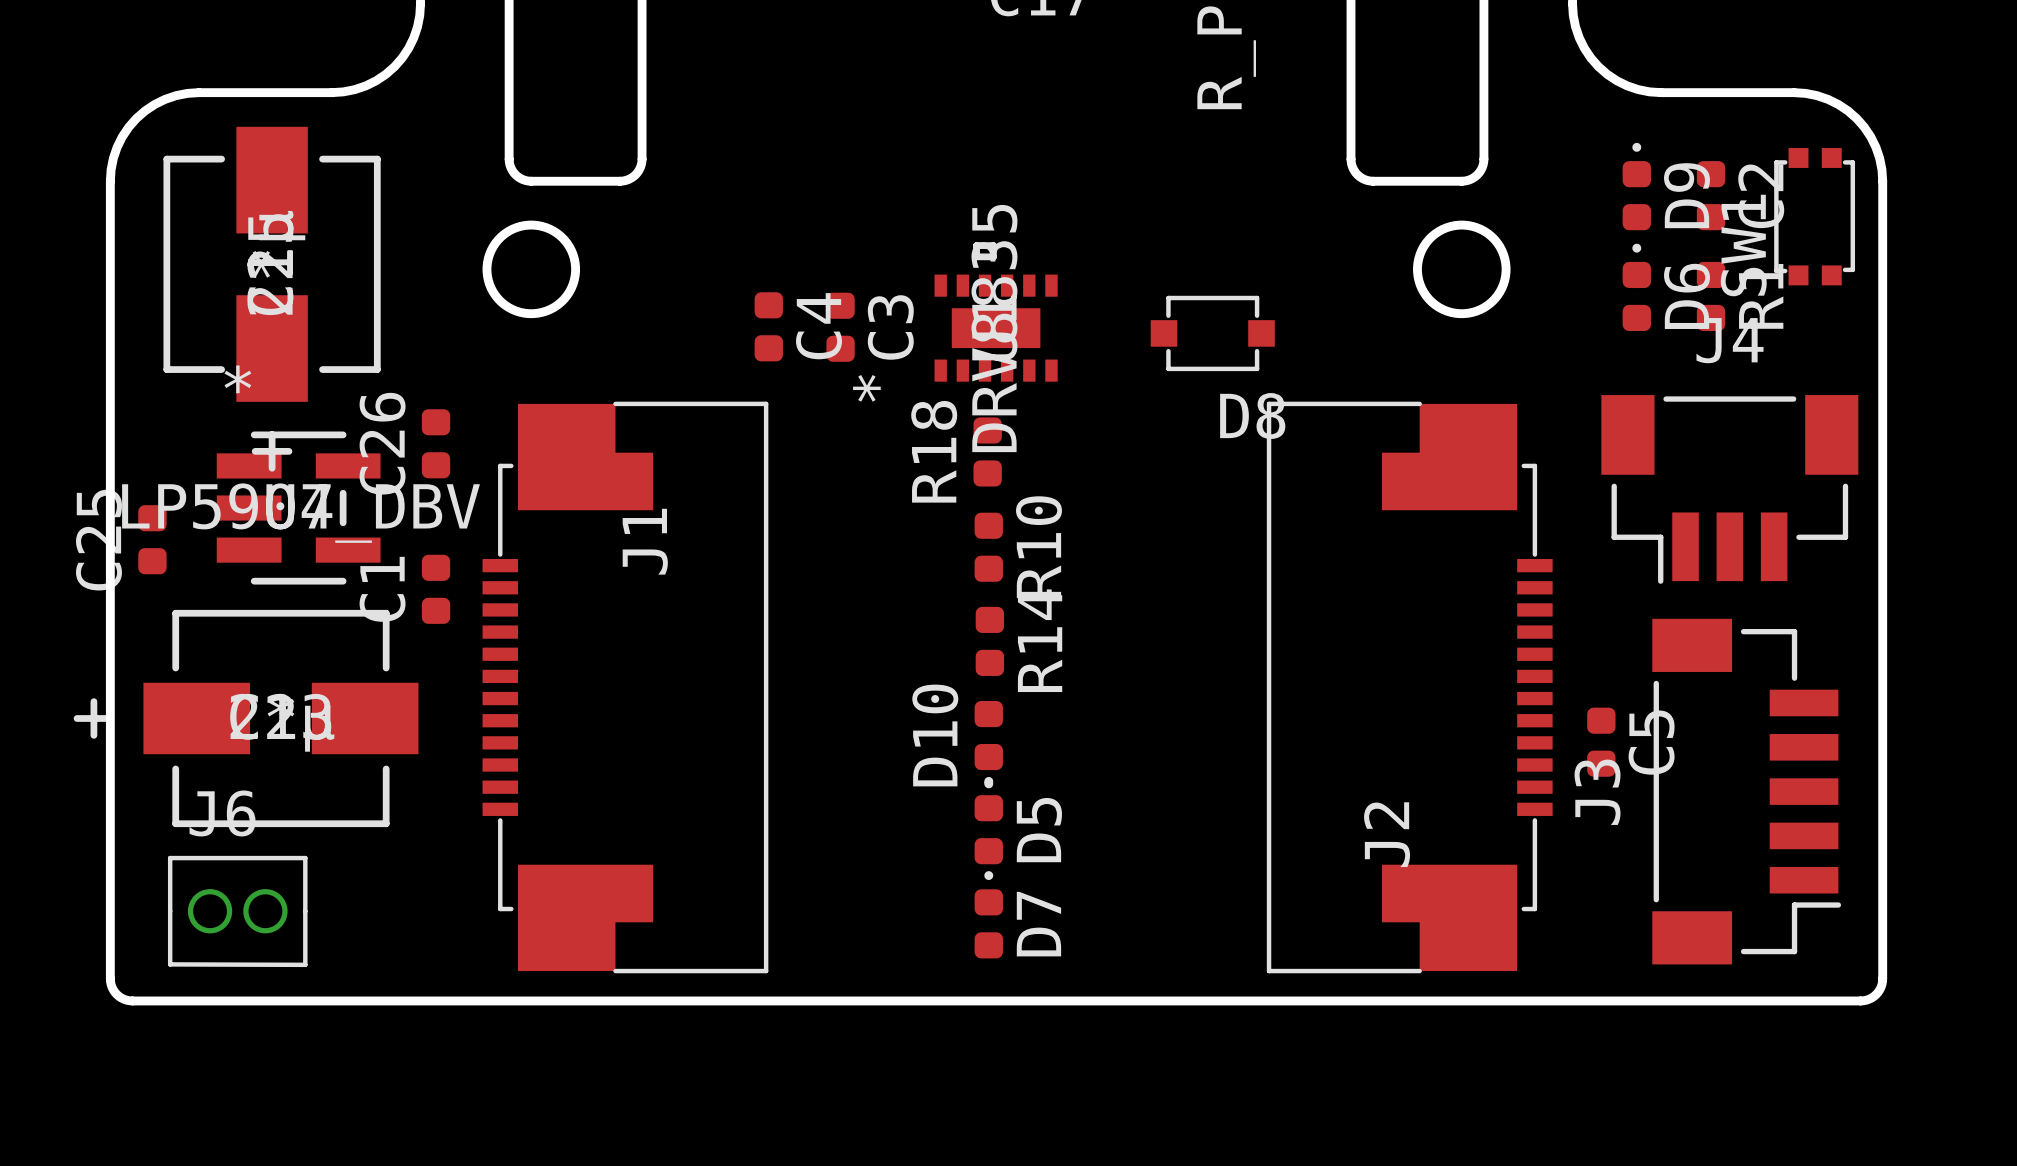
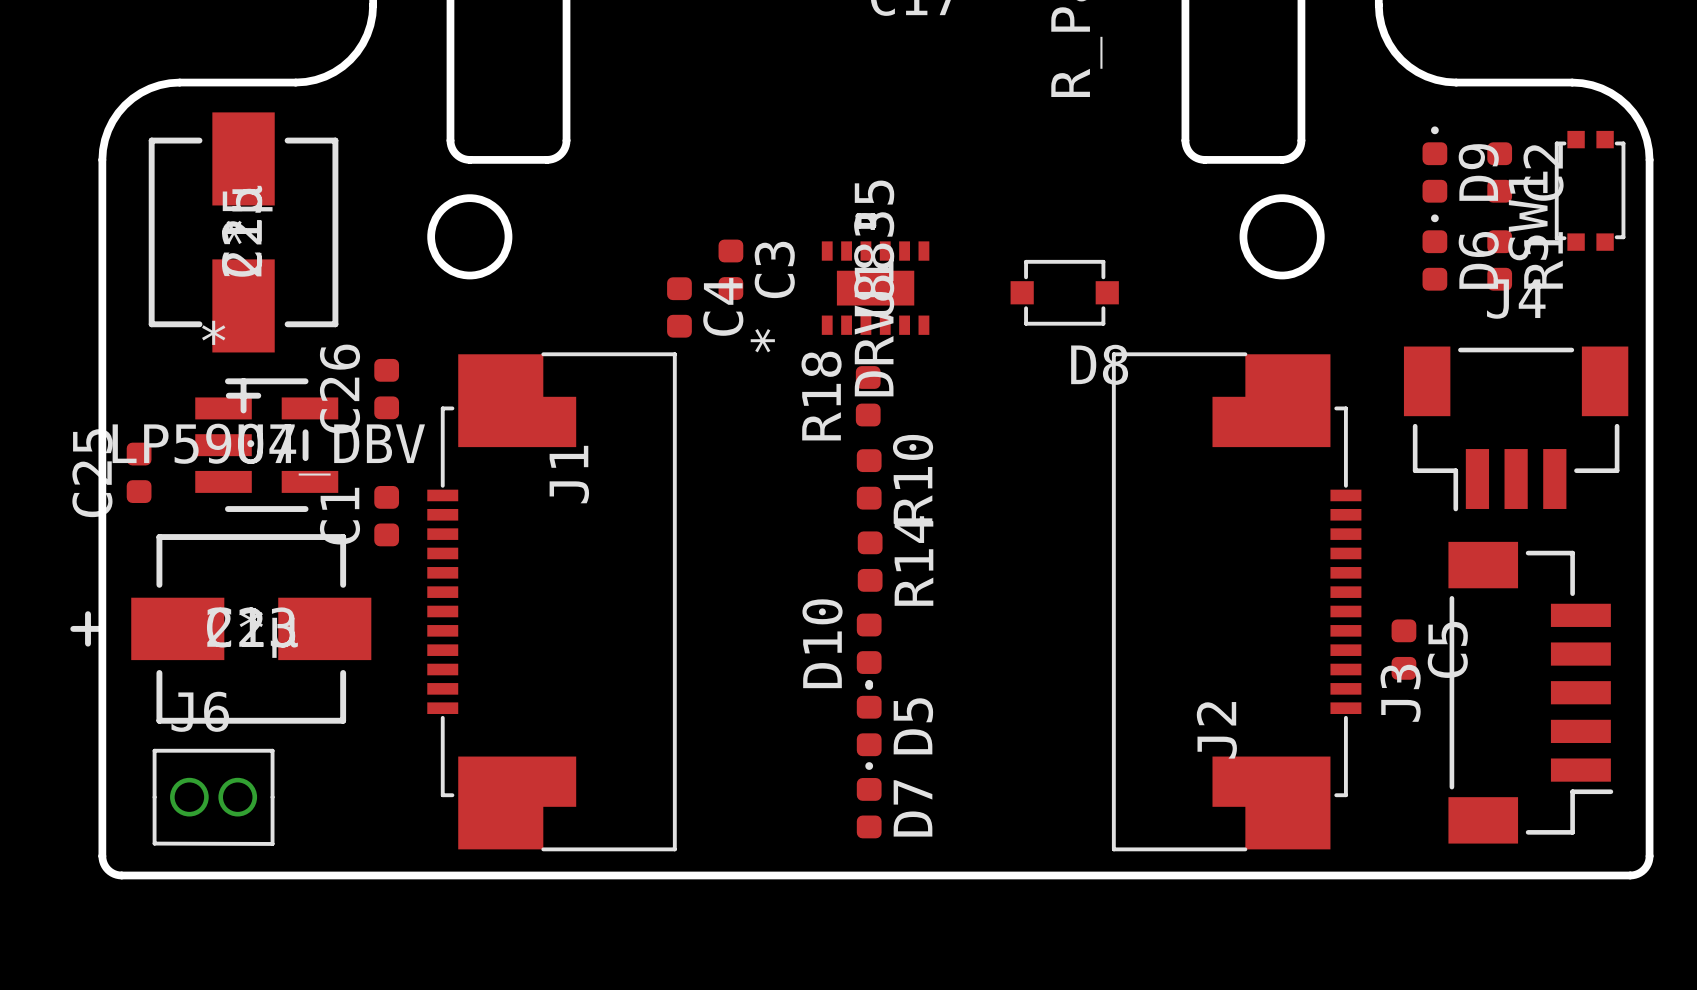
C4 position: (768, 326) -> (679, 307)
C3 position: (840, 327) -> (730, 269)

